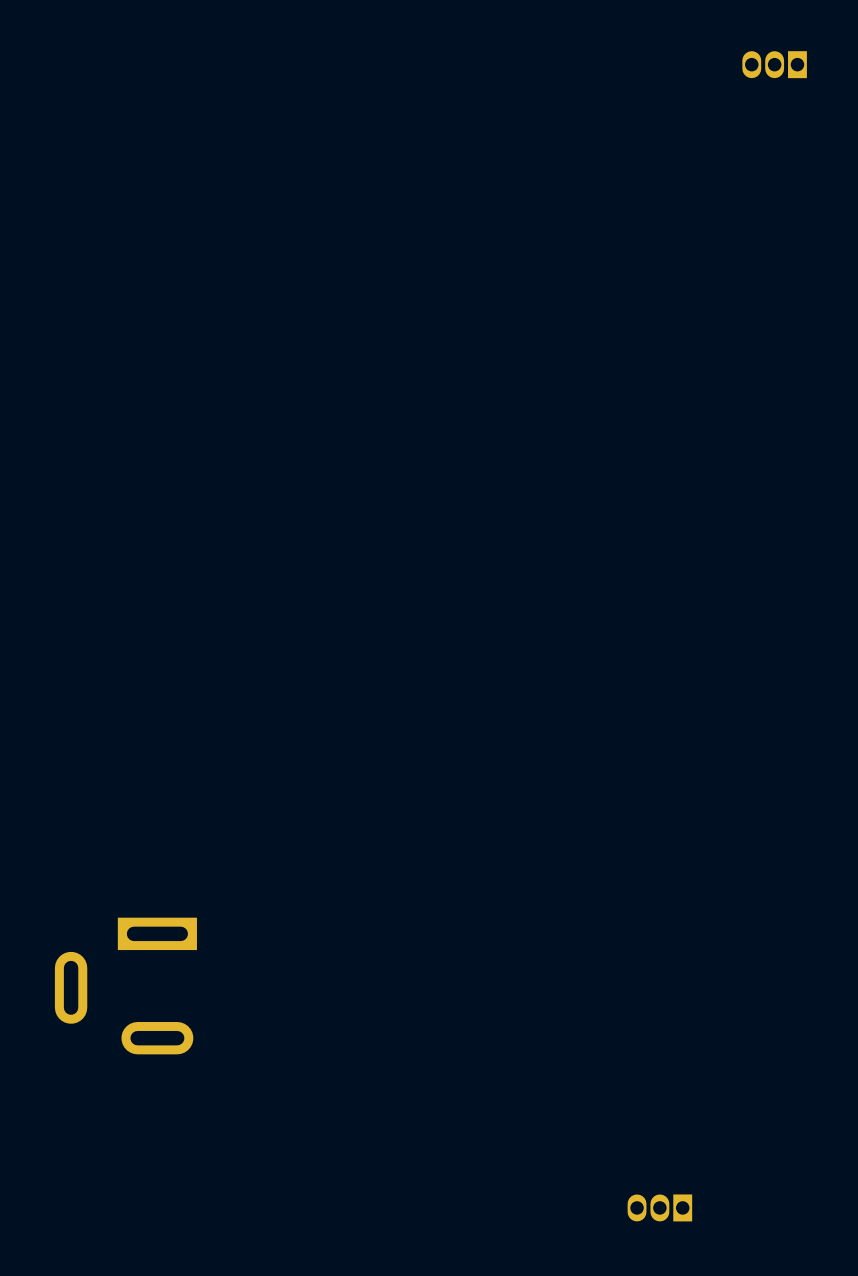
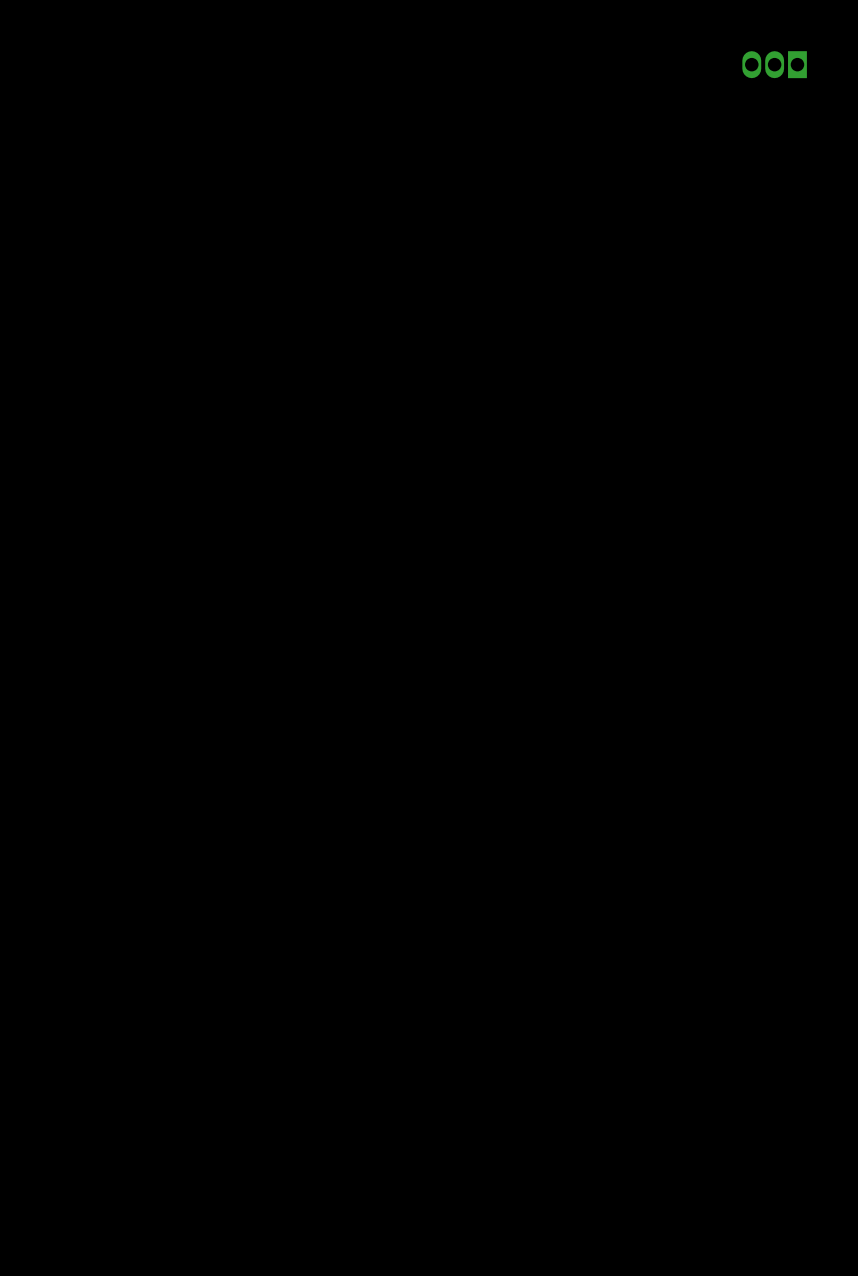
part: (125, 986) -> none
part: (659, 1207) -> none

